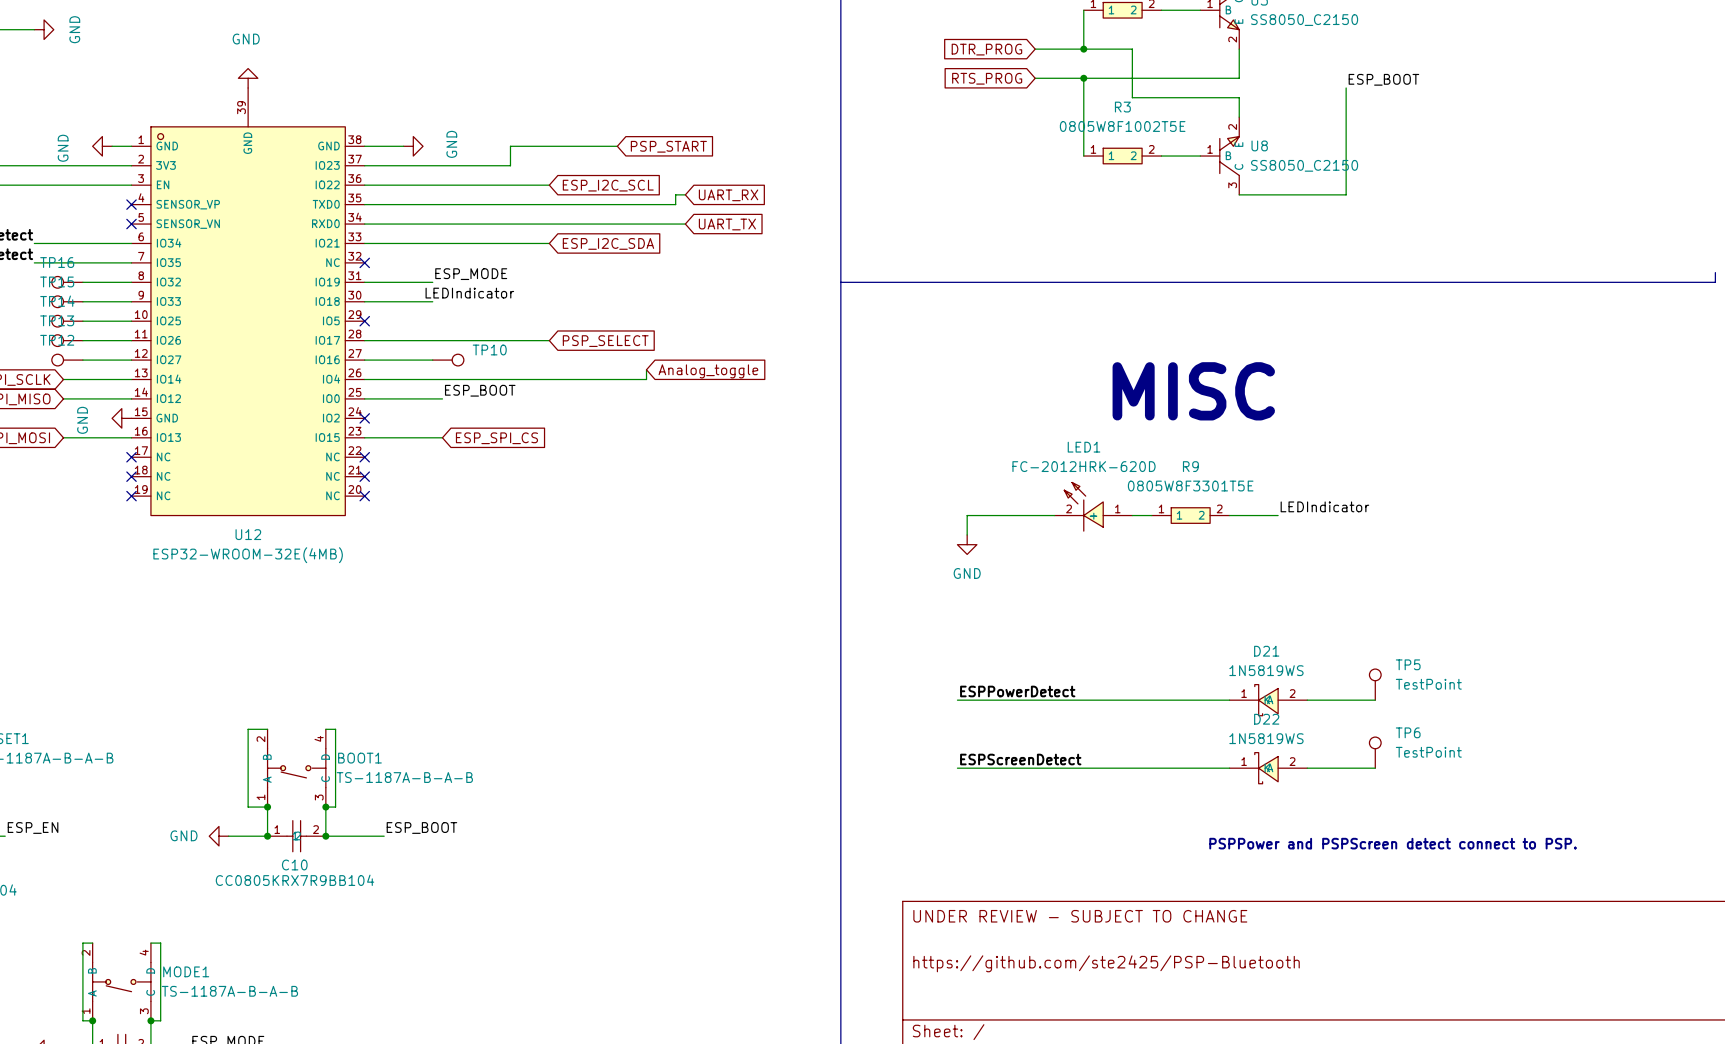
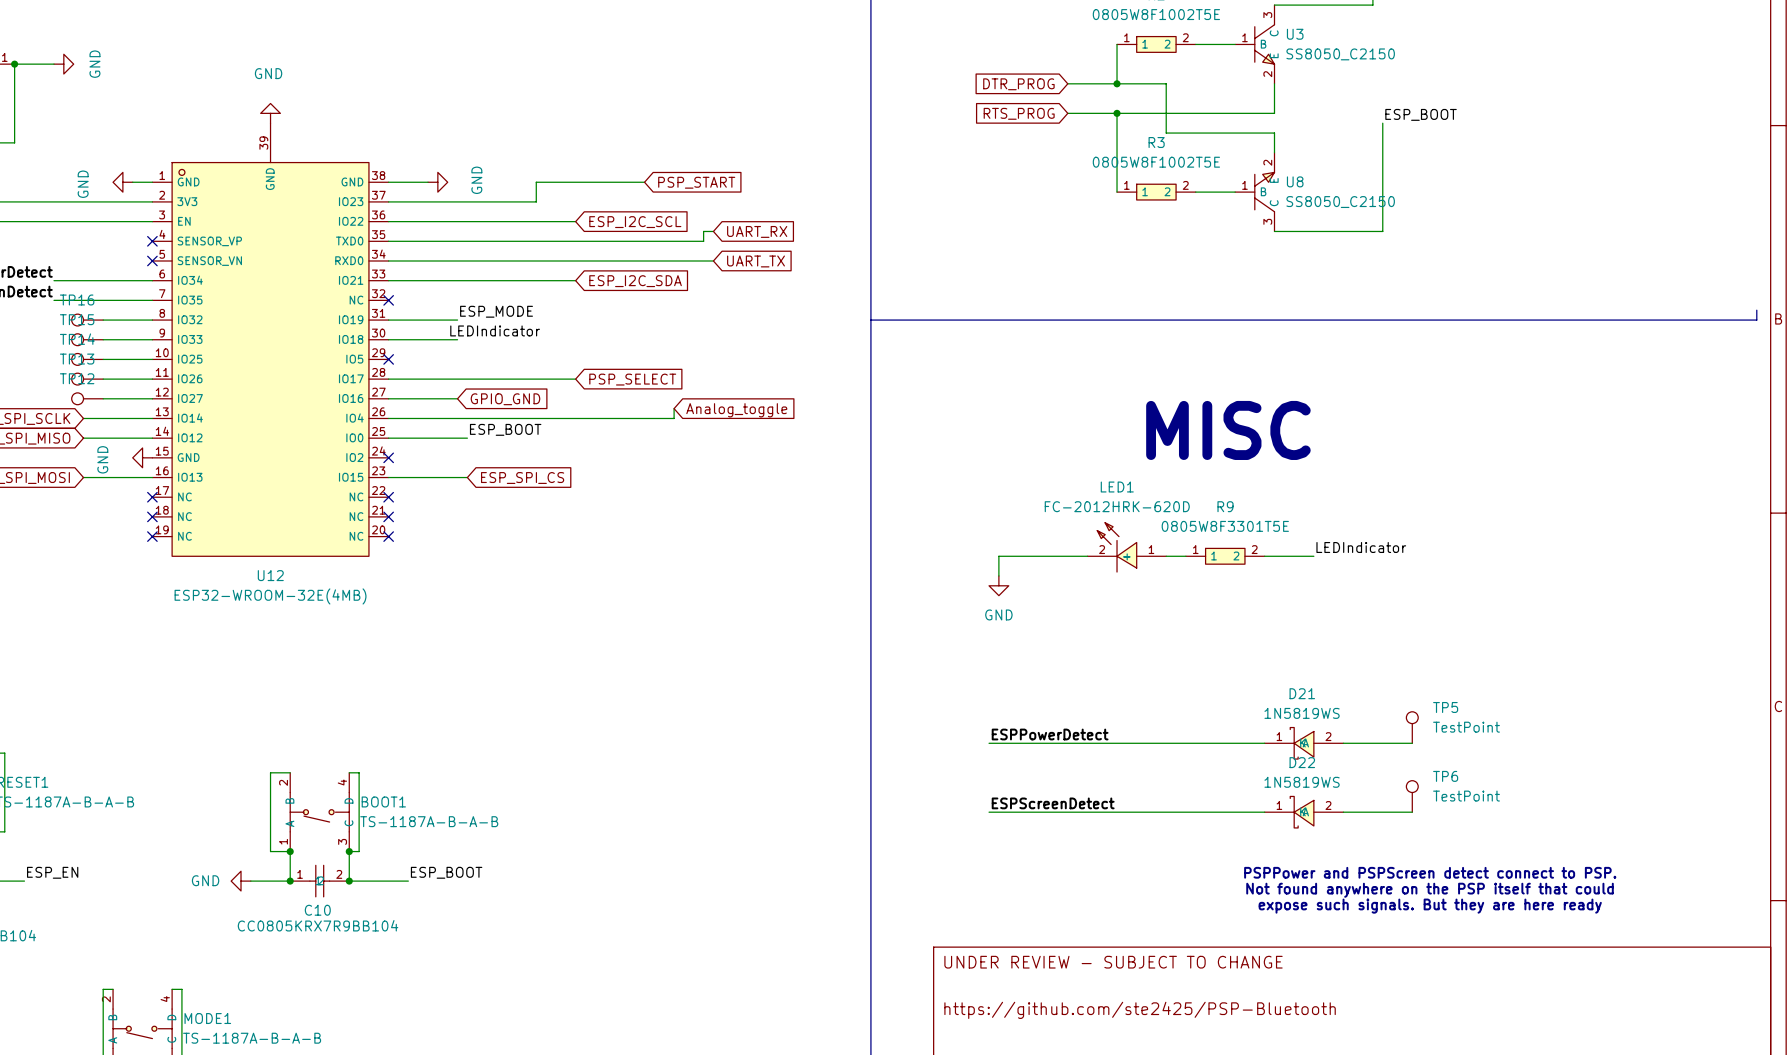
TP10: (448, 360) -> none
global label: none -> GPIO_GND (505, 399)
text: none -> PSPPower and PSPScreen detect connect to PSP. (1430, 872)
text: PSPPower and PSPScreen detect connect to PSP. (1393, 843) -> Not found anywhere on the PSP itself that could (1430, 890)
text: none -> expose such signals. But they are here ready (1430, 906)

